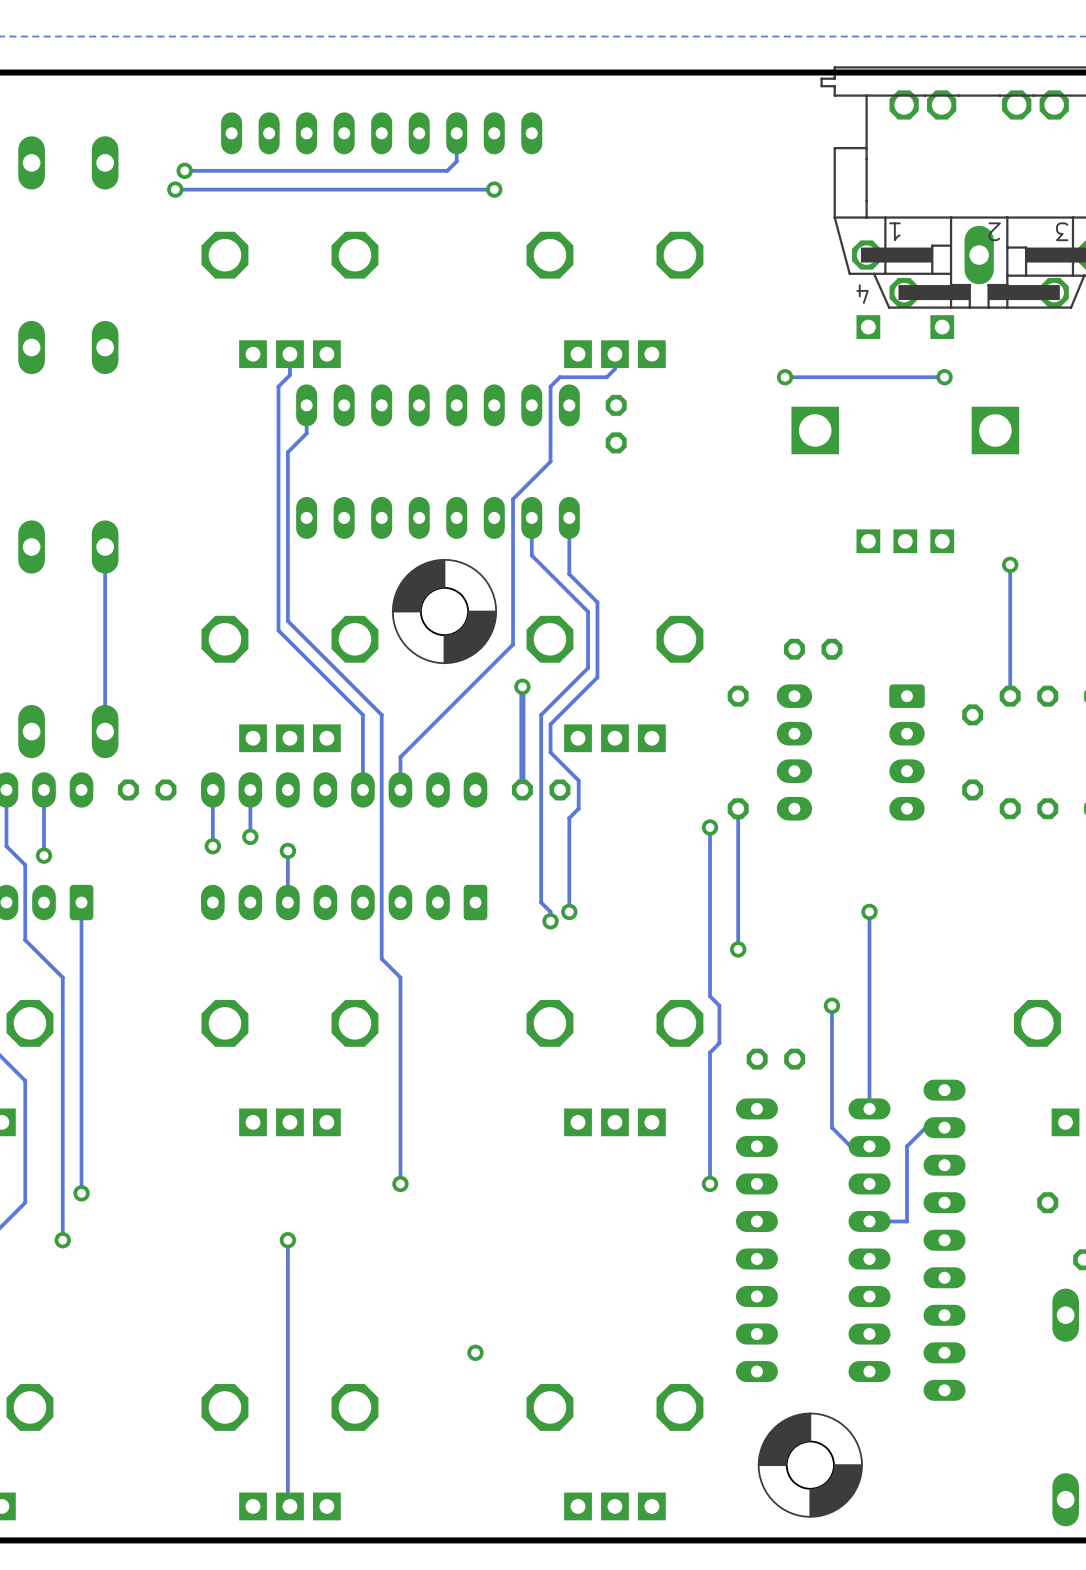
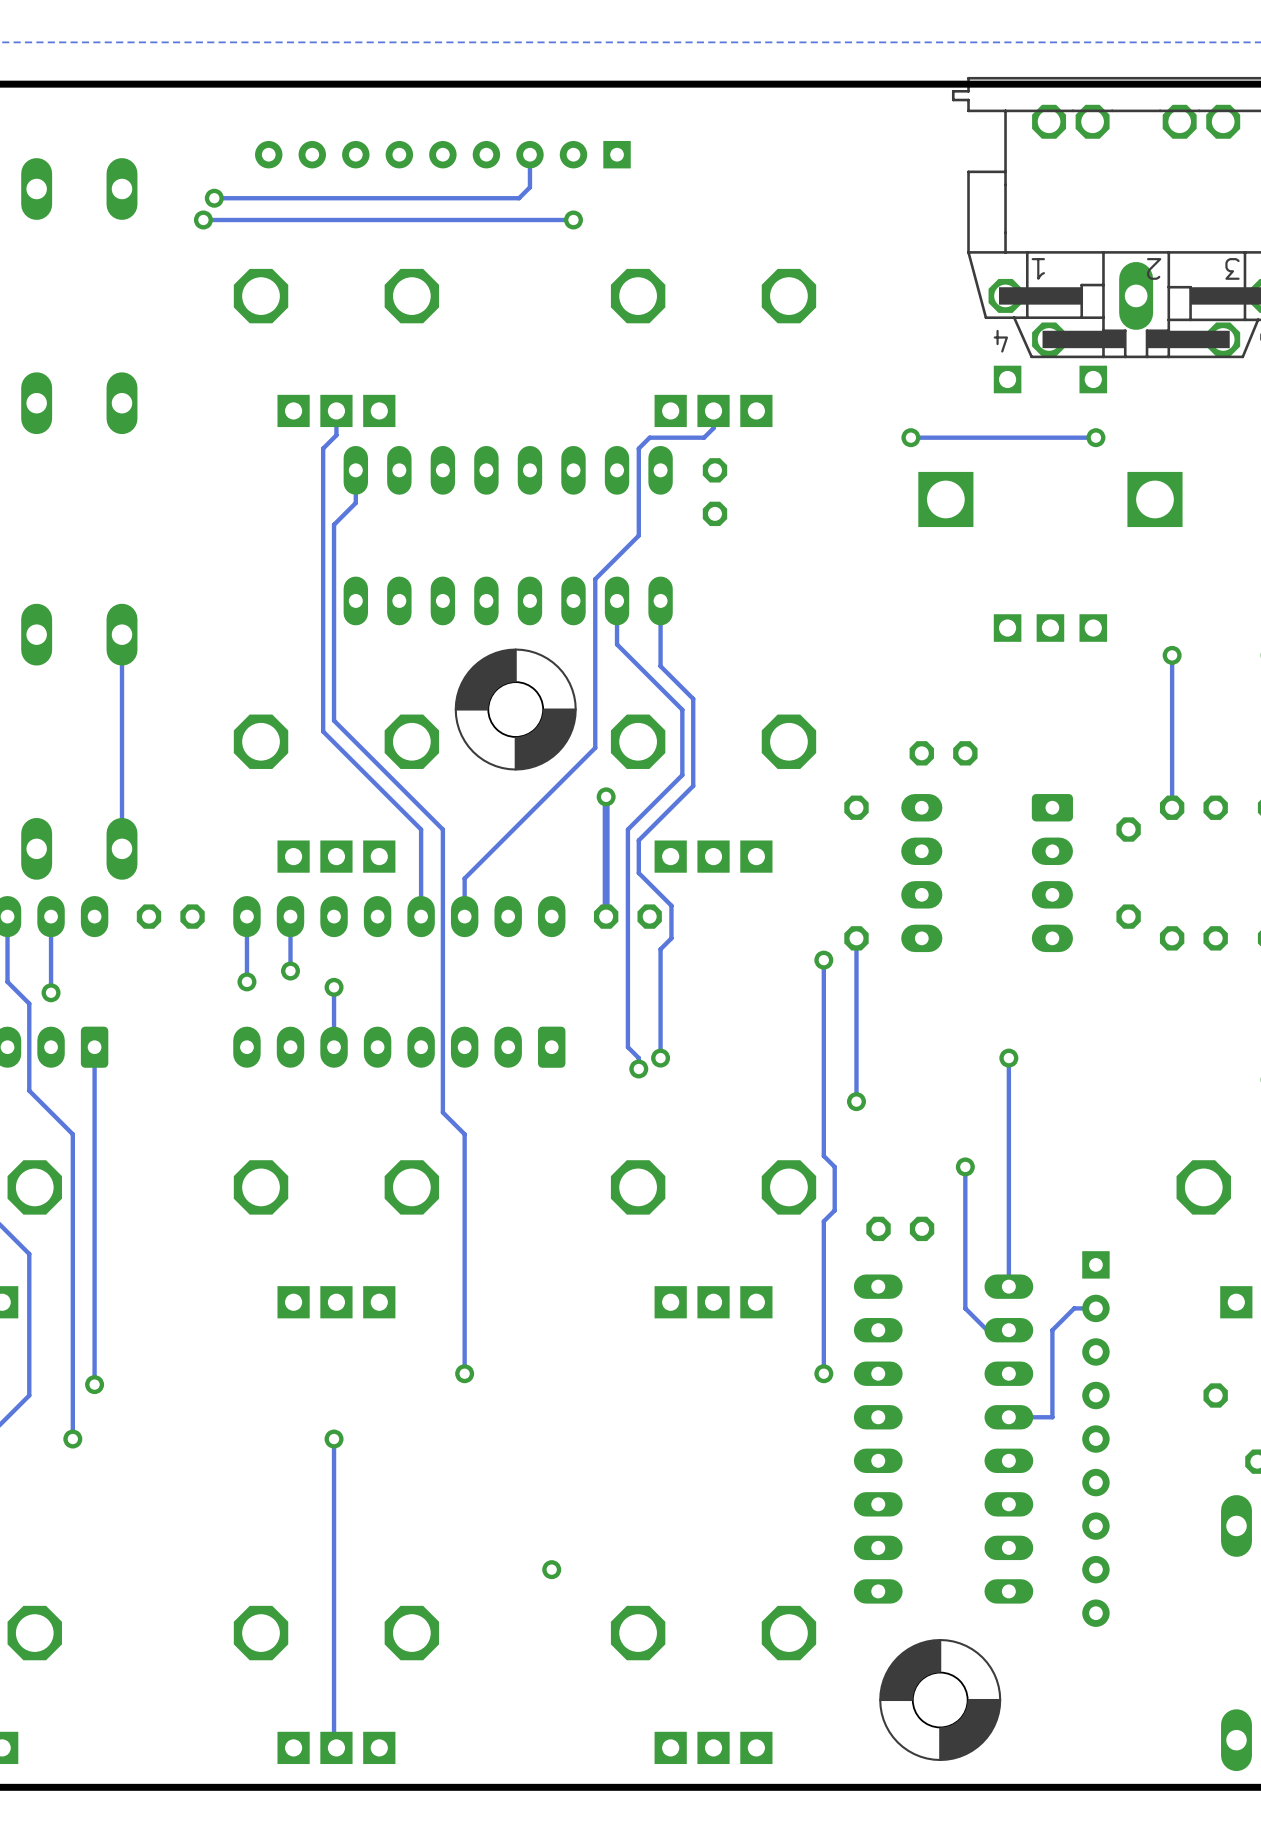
part footprint: [221, 112, 543, 155] -> [255, 140, 631, 169]
part footprint: [923, 1079, 966, 1401] -> [1082, 1251, 1110, 1627]

